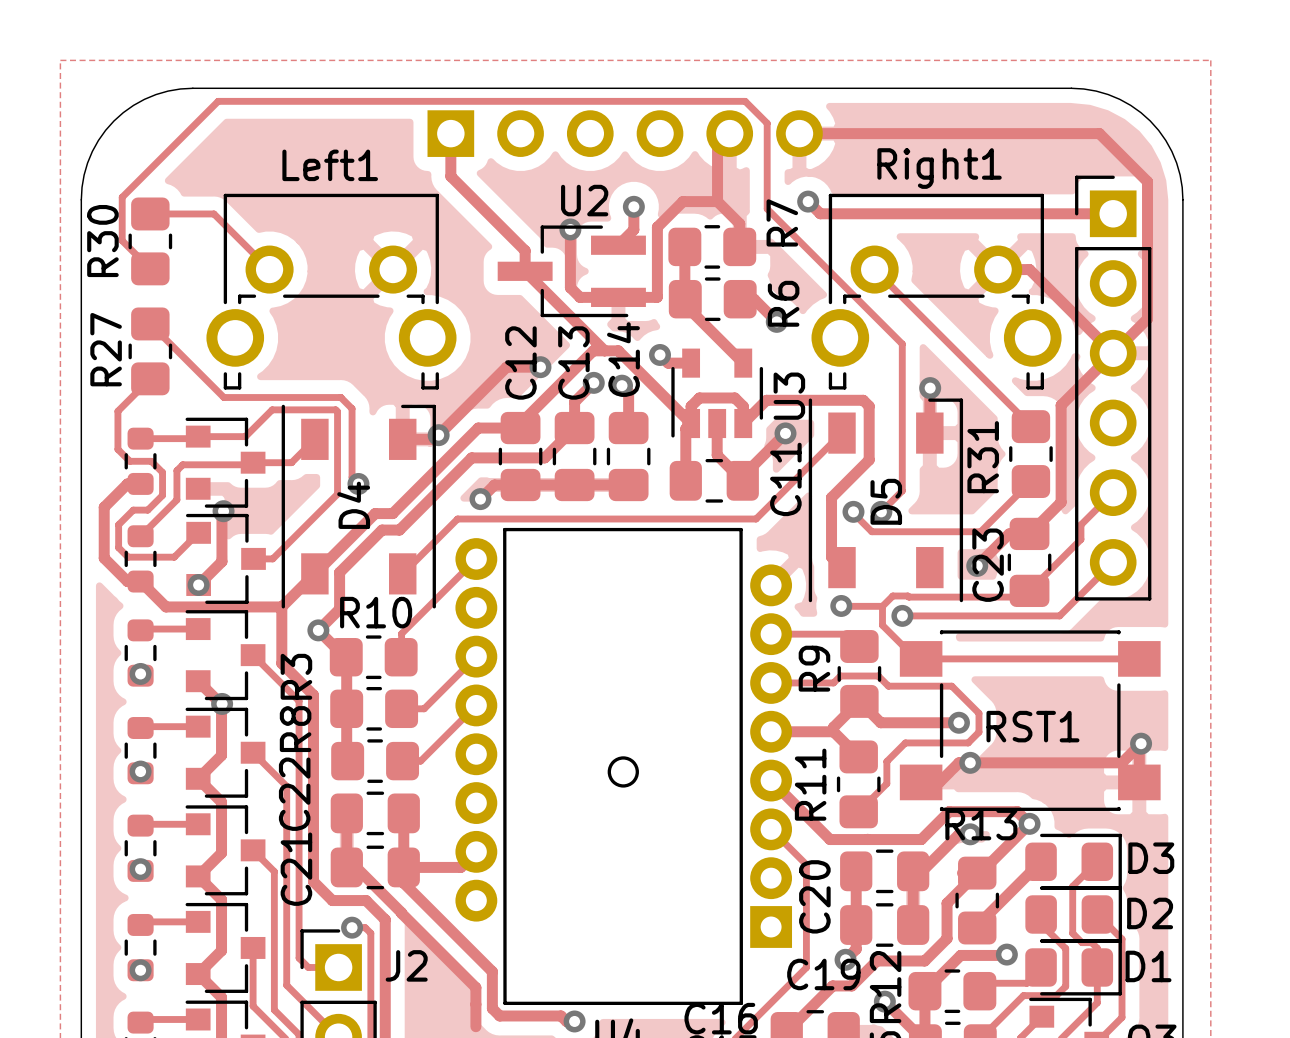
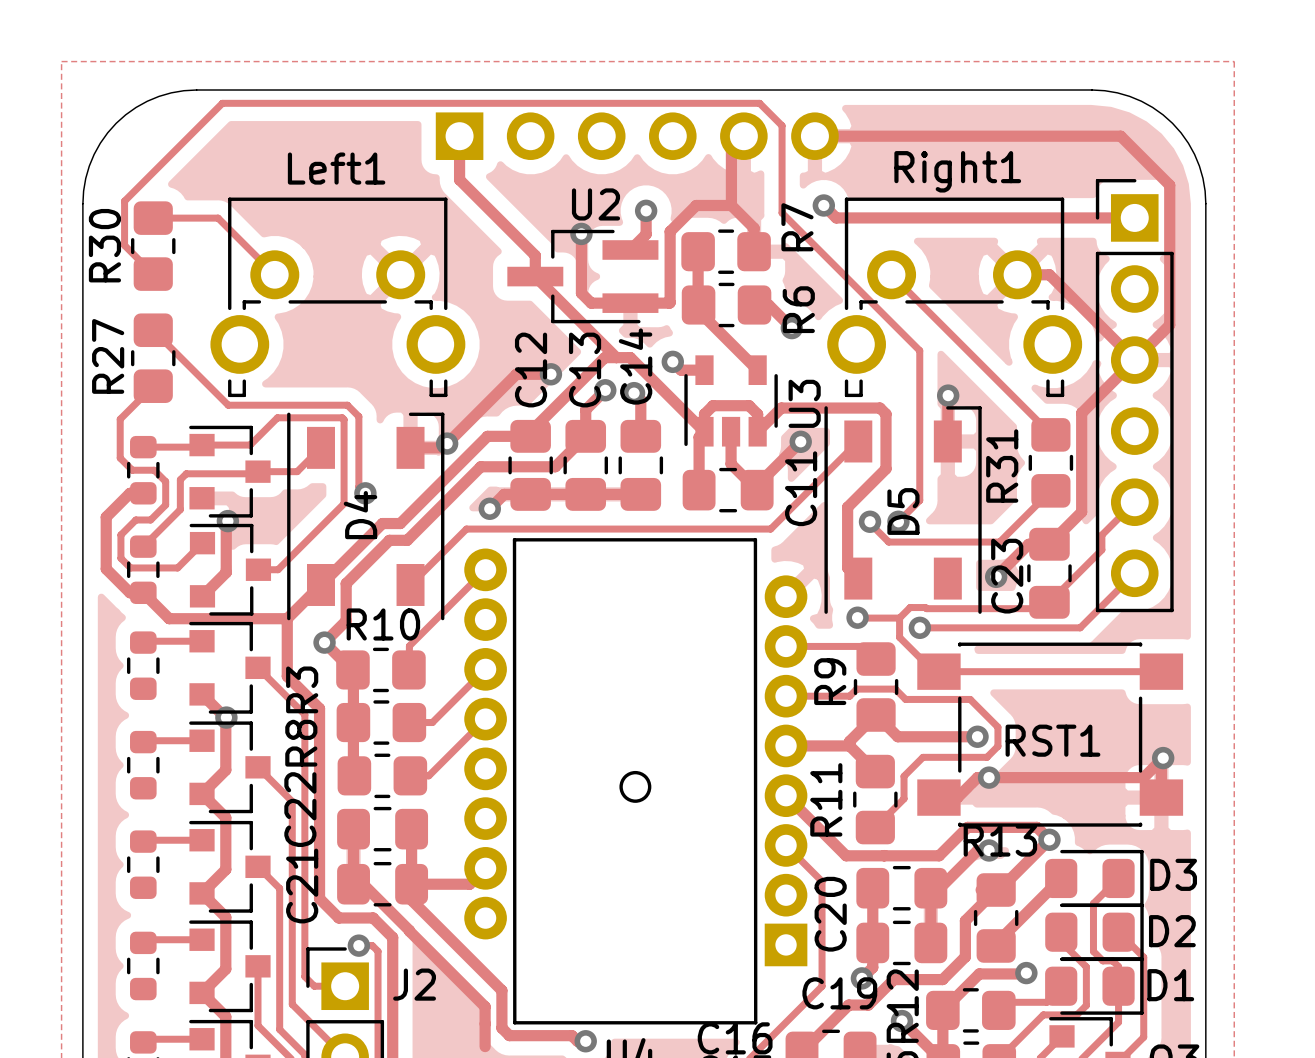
via: (198, 584) -> none
via: (140, 673) -> none
via: (140, 771) -> none
via: (140, 869) -> none
via: (140, 970) -> none

